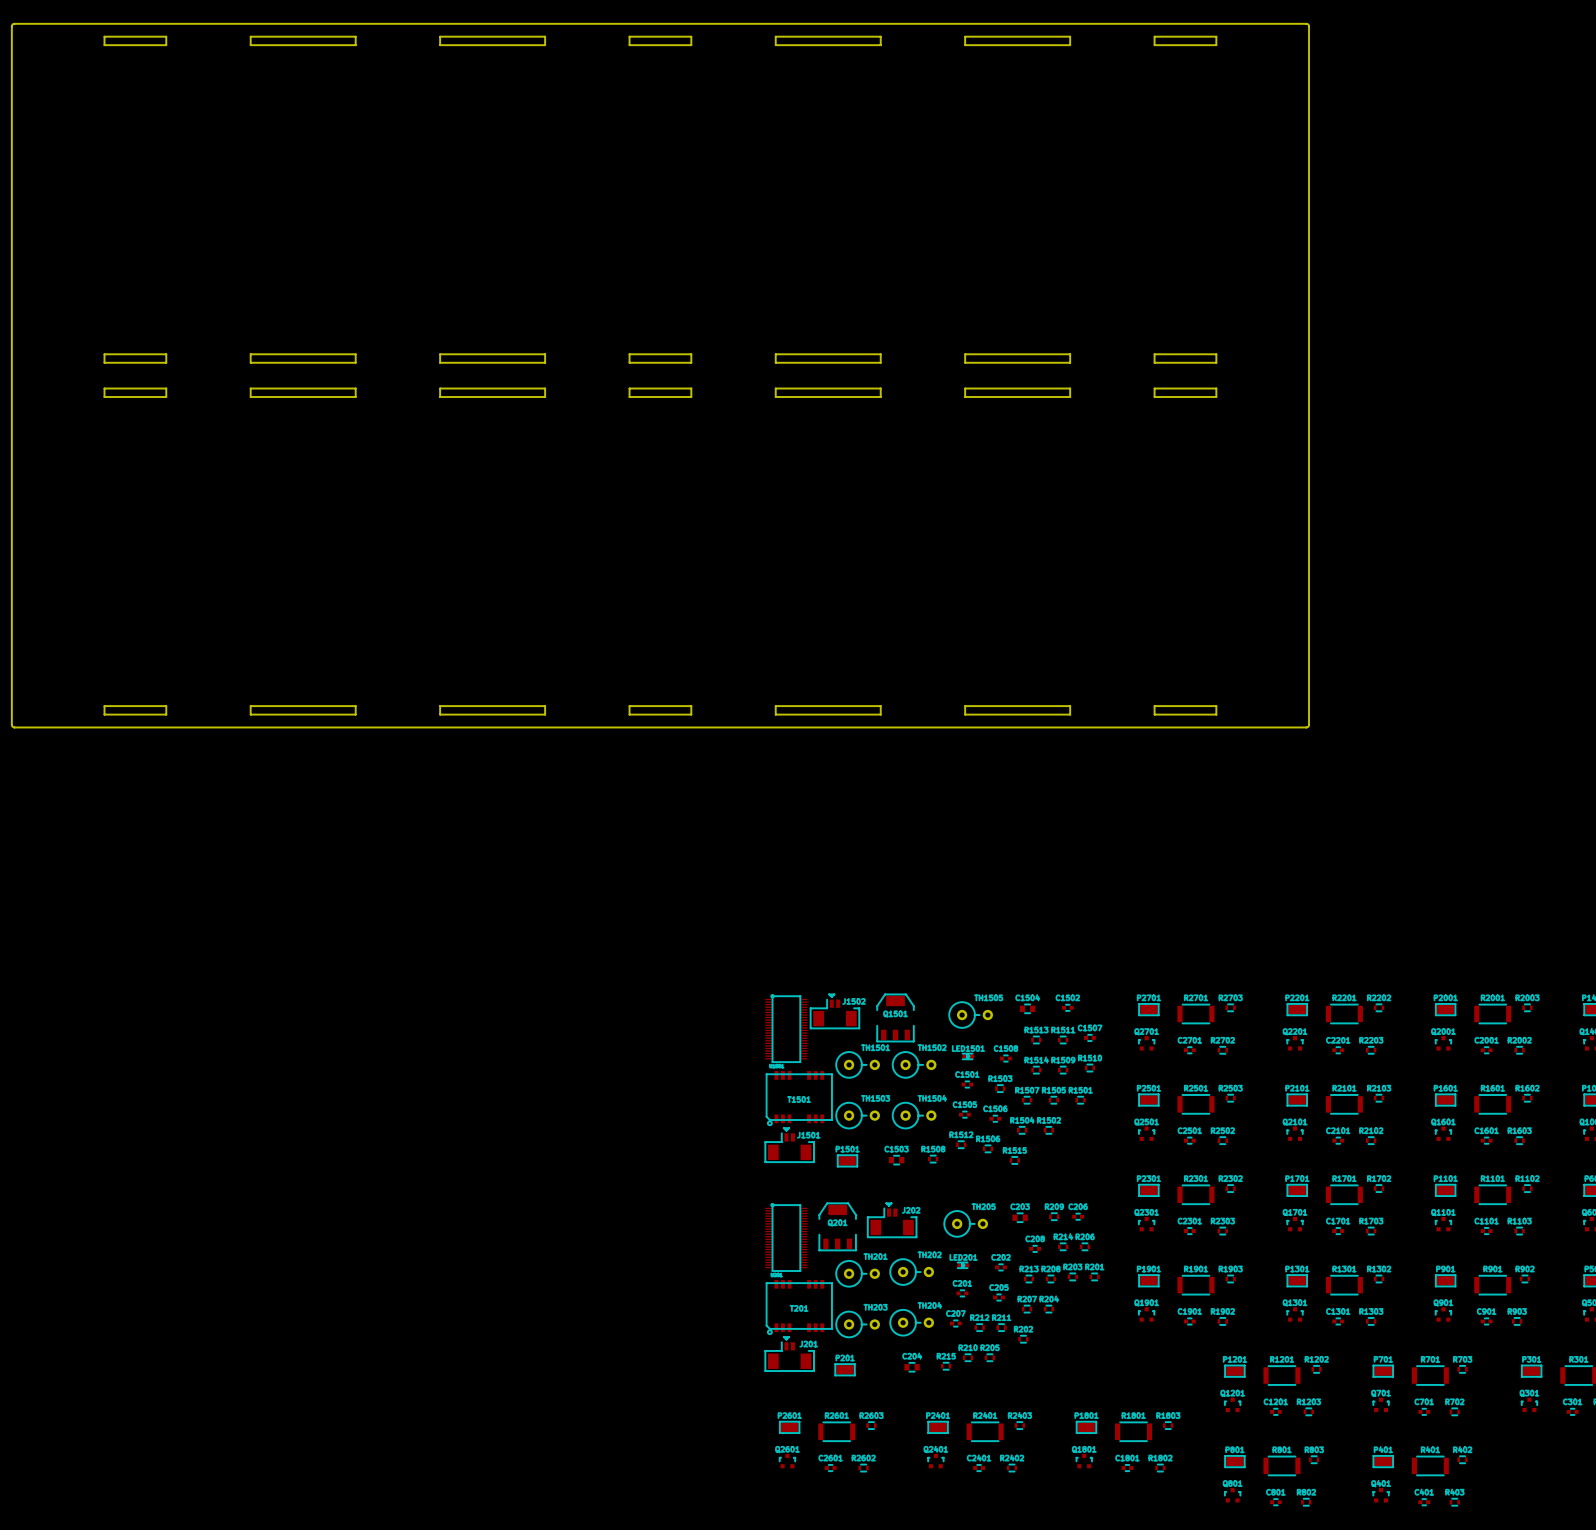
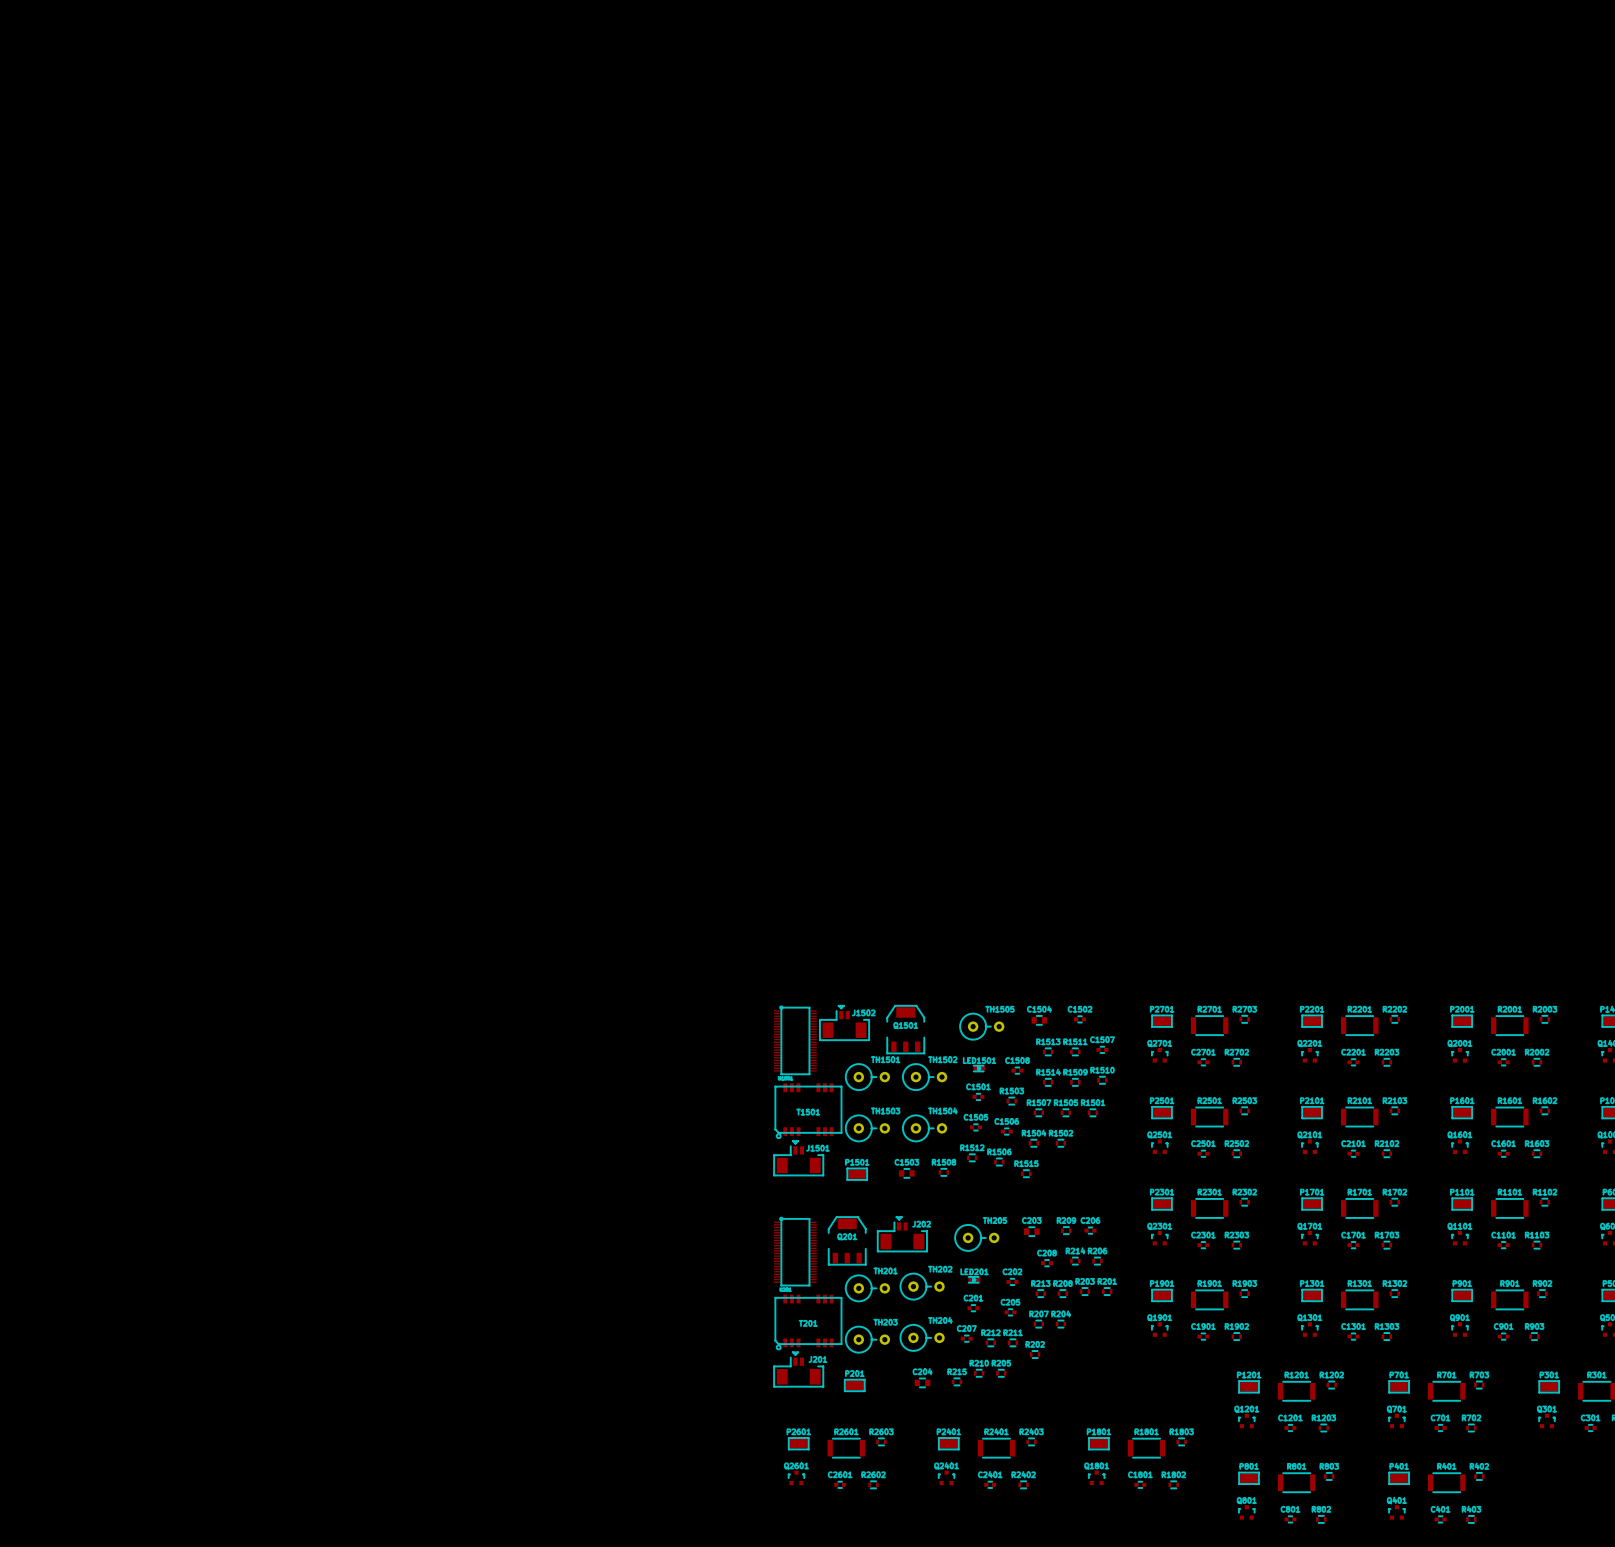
board edge: (14, 23) (1307, 24) (1308, 726) (13, 727) (11, 26) (14, 23) -> none
board edge: (104, 36) (104, 45) (166, 45) (166, 36) (104, 36) -> none
board edge: (250, 36) (250, 45) (355, 45) (355, 36) (250, 36) -> none
board edge: (440, 36) (440, 45) (545, 45) (545, 36) (440, 36) -> none
board edge: (629, 36) (629, 45) (691, 45) (691, 36) (629, 36) -> none
board edge: (775, 36) (775, 45) (880, 45) (880, 36) (775, 36) -> none
board edge: (965, 36) (965, 45) (1070, 45) (1070, 36) (965, 36) -> none
board edge: (1154, 36) (1154, 45) (1216, 45) (1216, 36) (1154, 36) -> none
board edge: (104, 354) (104, 362) (166, 362) (166, 354) (104, 354) -> none
board edge: (250, 354) (355, 354) (355, 362) (250, 362) (250, 354) -> none
board edge: (440, 354) (545, 354) (545, 362) (440, 362) (440, 354) -> none
board edge: (629, 354) (691, 354) (691, 362) (629, 362) (629, 354) -> none
board edge: (775, 354) (880, 354) (880, 362) (775, 362) (775, 354) -> none
board edge: (965, 354) (1070, 354) (1070, 362) (965, 362) (965, 354) -> none
board edge: (1154, 354) (1216, 354) (1216, 362) (1154, 362) (1154, 354) -> none
board edge: (104, 388) (104, 397) (166, 397) (166, 388) (104, 388) -> none
board edge: (250, 388) (250, 397) (355, 397) (355, 388) (250, 388) -> none
board edge: (440, 388) (440, 397) (545, 397) (545, 388) (440, 388) -> none
board edge: (629, 388) (629, 397) (691, 397) (691, 388) (629, 388) -> none
board edge: (775, 388) (775, 397) (880, 397) (880, 388) (775, 388) -> none
board edge: (965, 388) (965, 397) (1070, 397) (1070, 388) (965, 388) -> none
board edge: (1154, 388) (1154, 397) (1216, 397) (1216, 388) (1154, 388) -> none
board edge: (104, 706) (104, 714) (166, 714) (166, 706) (104, 706) -> none
board edge: (250, 706) (250, 714) (355, 714) (355, 706) (250, 706) -> none
board edge: (440, 706) (440, 714) (545, 714) (545, 706) (440, 706) -> none
board edge: (629, 706) (629, 714) (691, 714) (691, 706) (629, 706) -> none
board edge: (775, 706) (775, 714) (880, 714) (880, 706) (775, 706) -> none
board edge: (965, 706) (965, 714) (1070, 714) (1070, 706) (965, 706) -> none
board edge: (1154, 706) (1154, 714) (1216, 714) (1216, 706) (1154, 706) -> none

